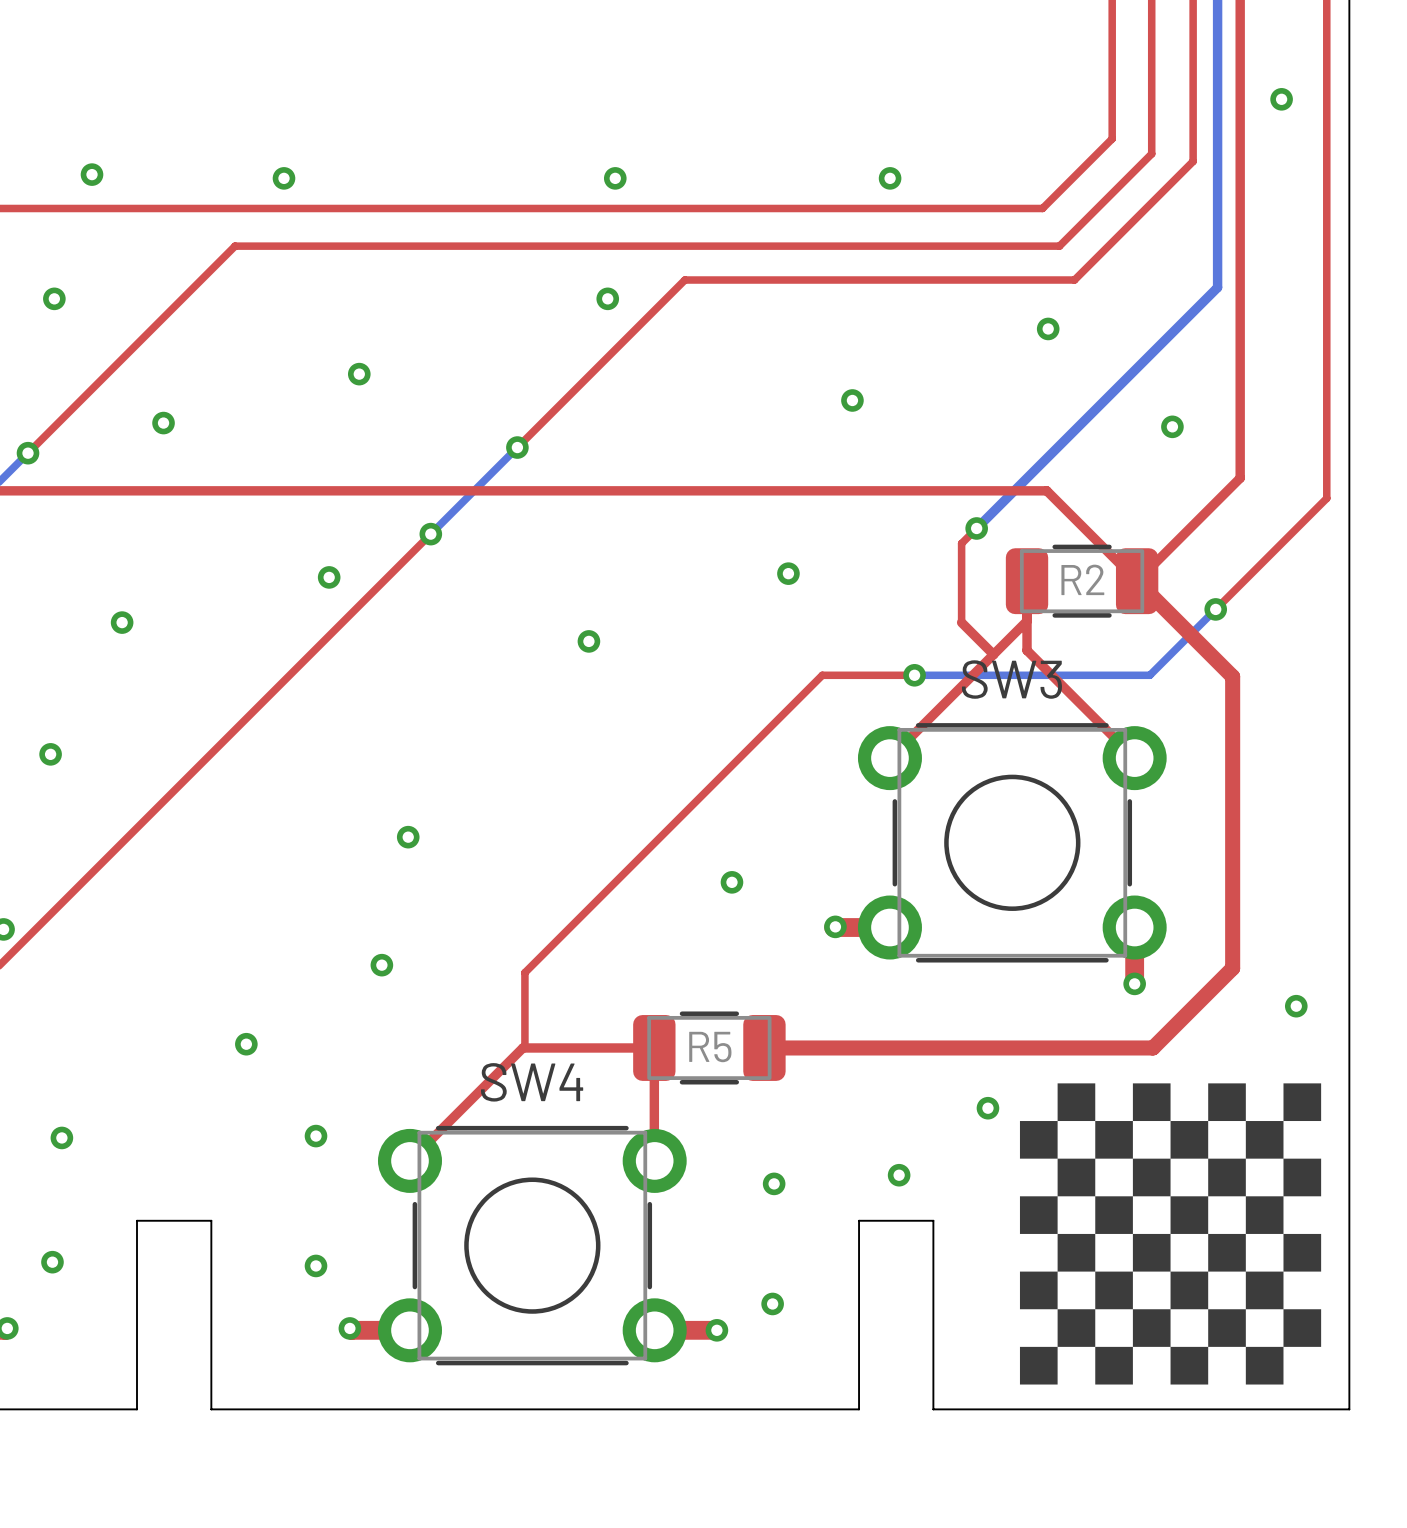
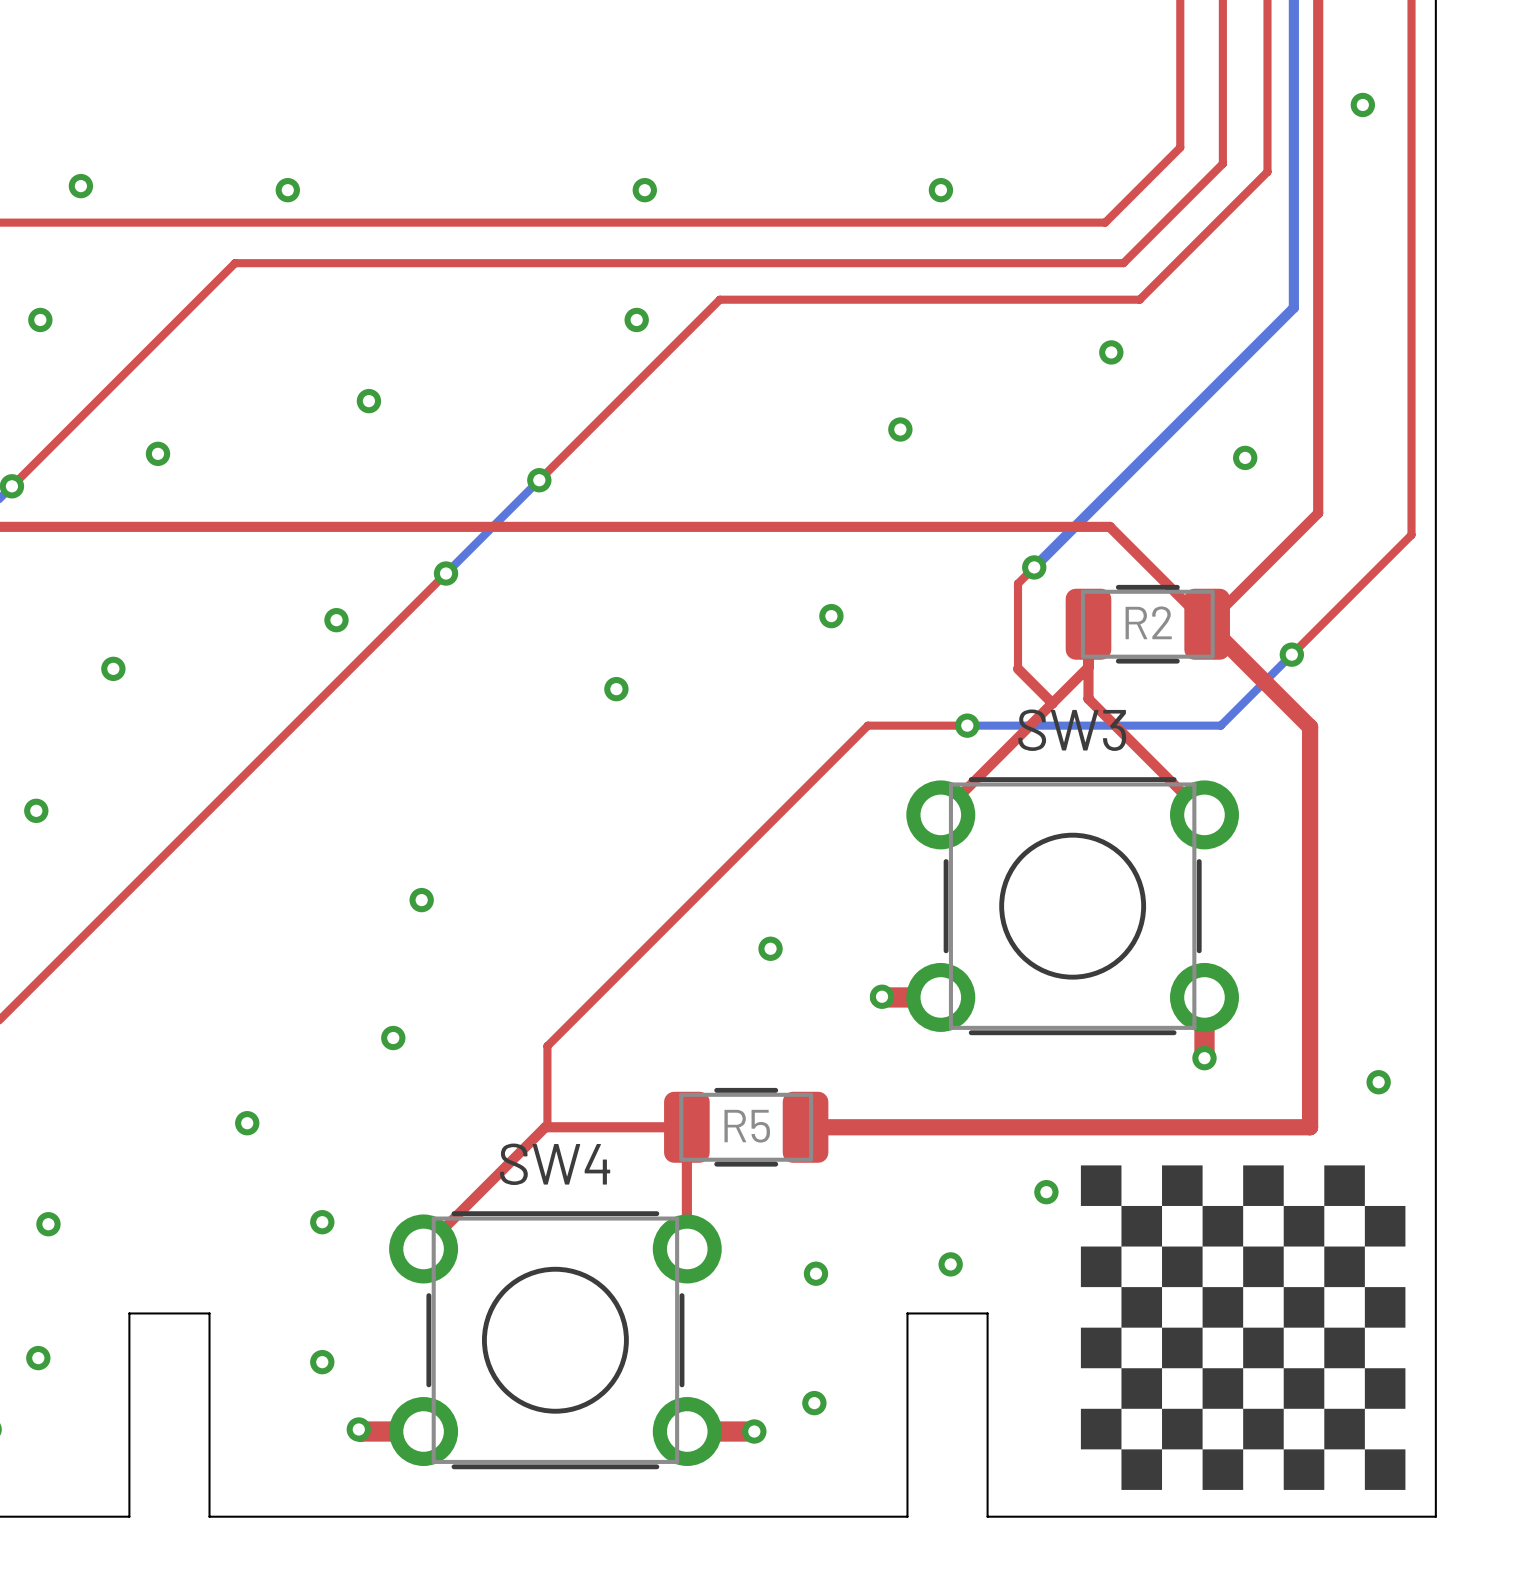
top track: (1232, 968) (1152, 1047) -> (1310, 1041) (1310, 1127) (1224, 1127)
drawing: [1019, 1083, 1322, 1385] -> none
drawing: none -> [1080, 1165, 1406, 1490]

